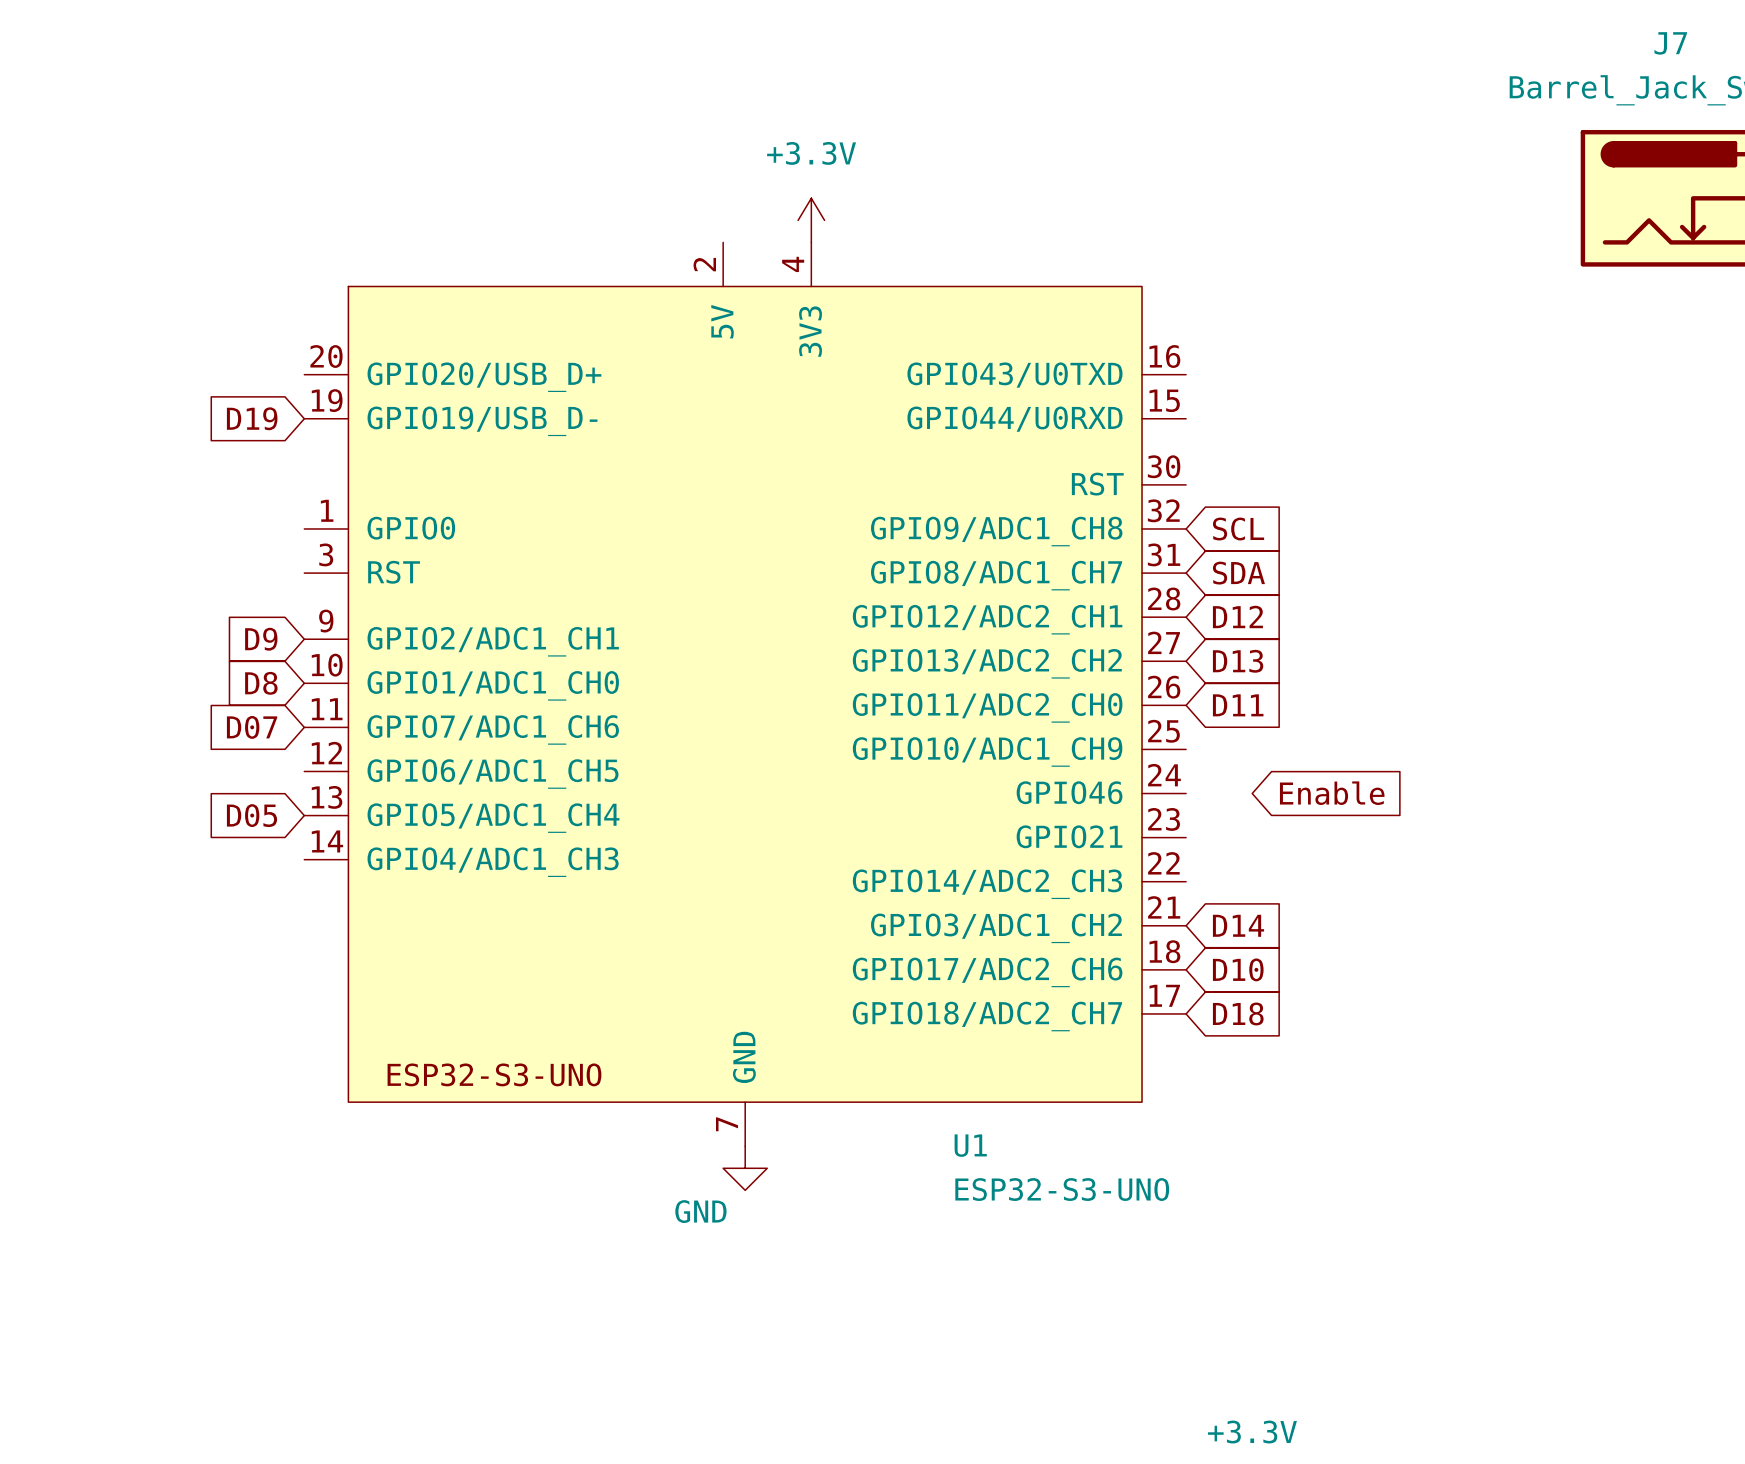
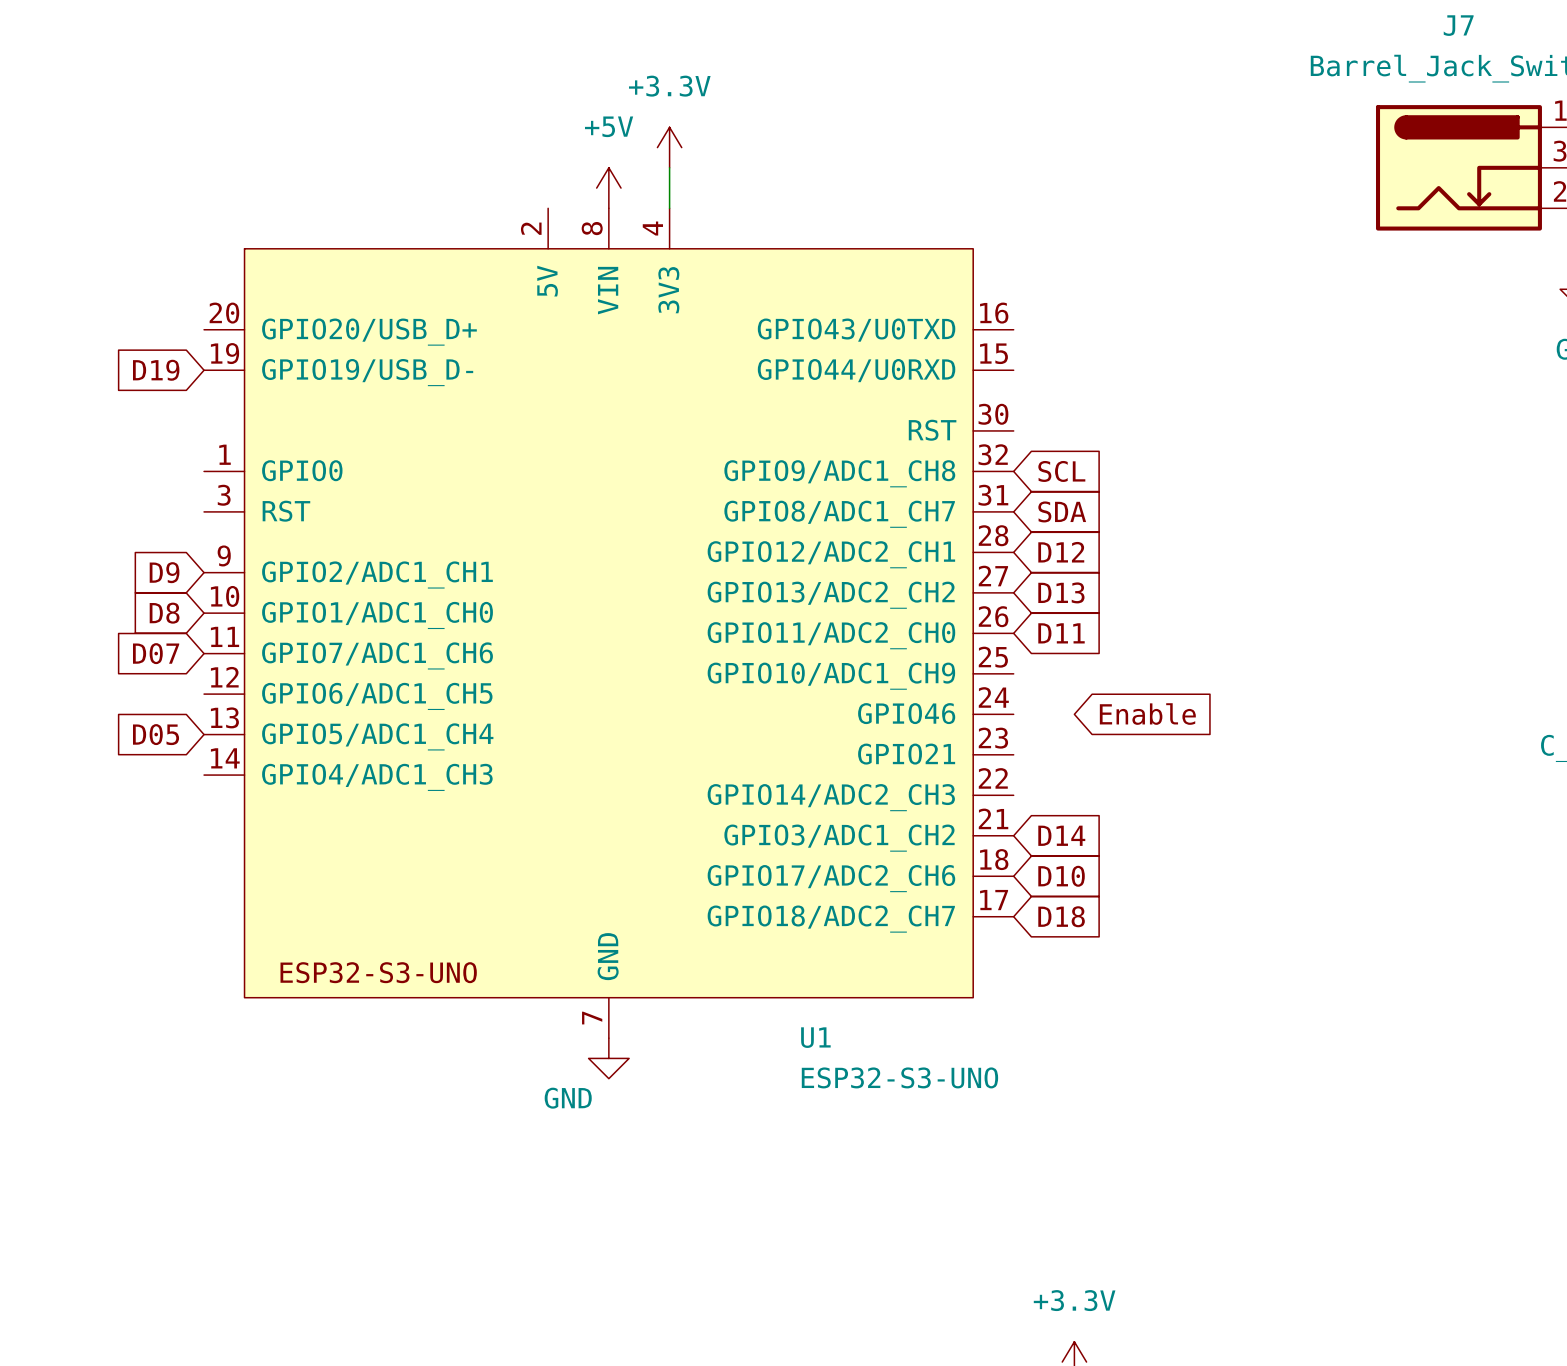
power symbol: none -> +5V (608, 188)
power symbol position: +3.3V (811, 220) -> +3.3V (669, 147)
U1 symbol: [304, 242, 1187, 1147] -> [204, 208, 1014, 1039]

